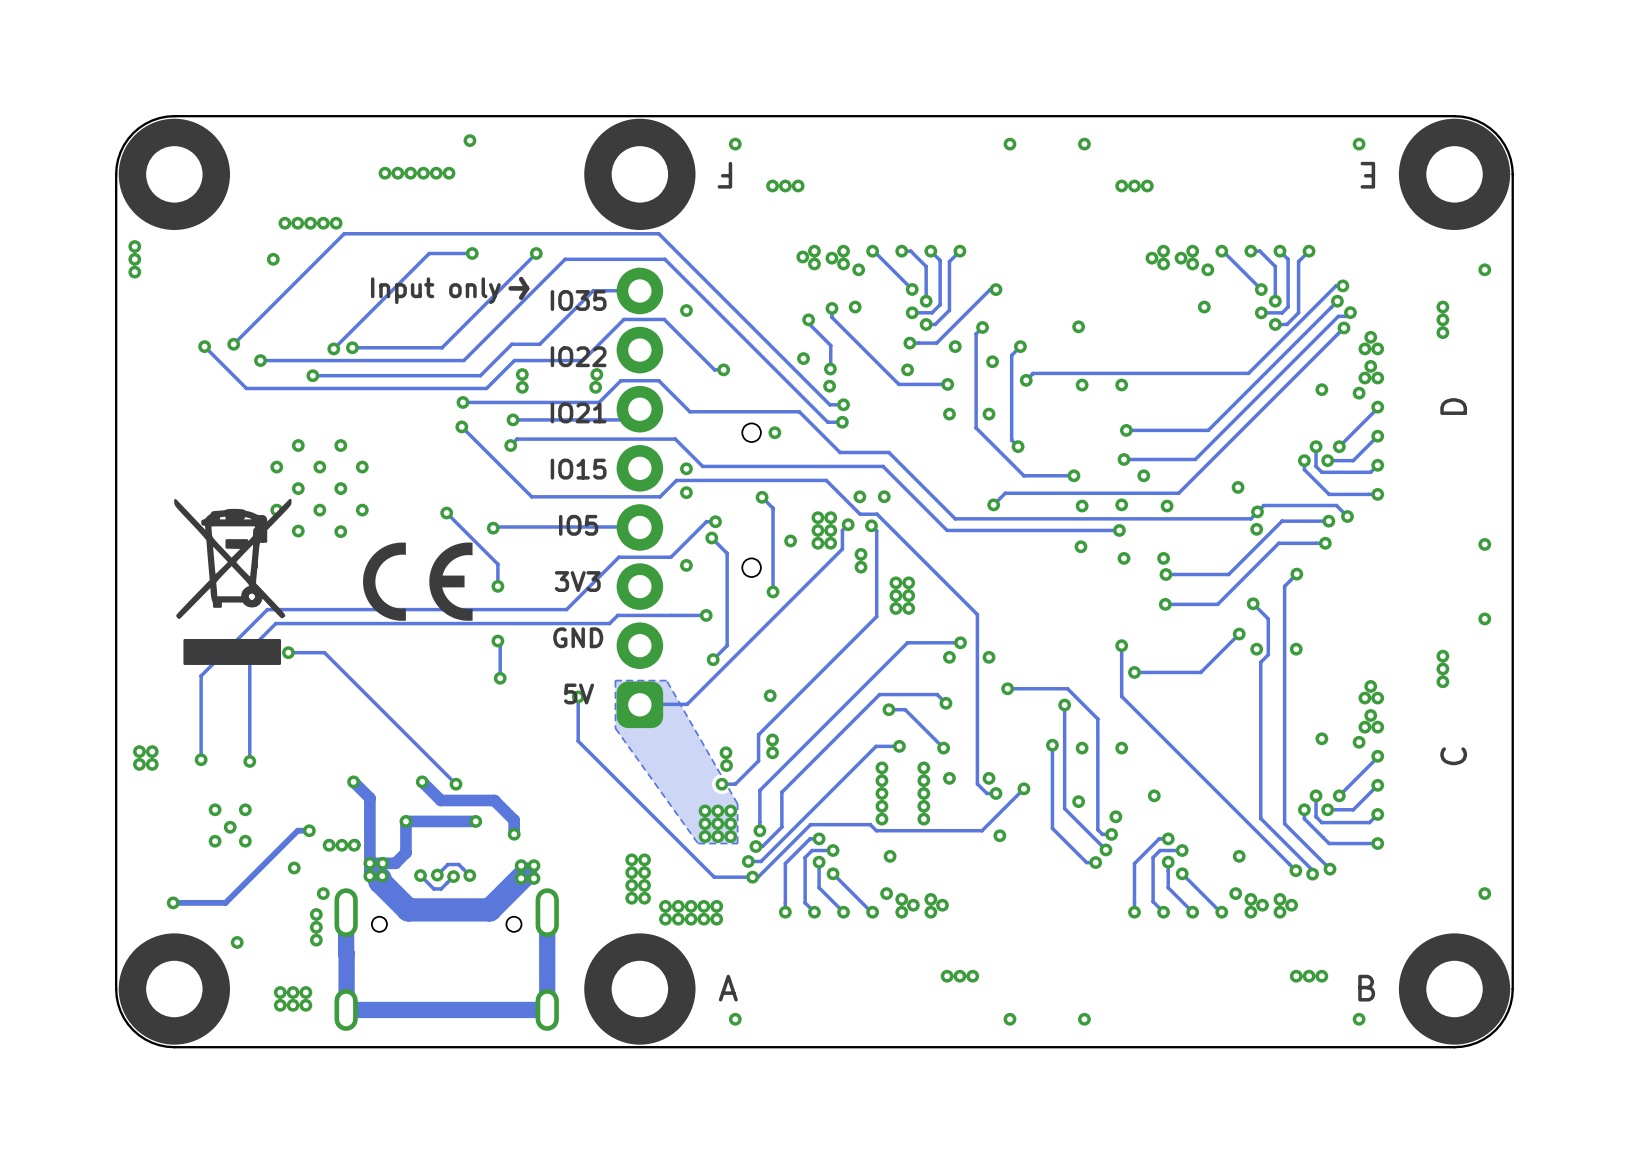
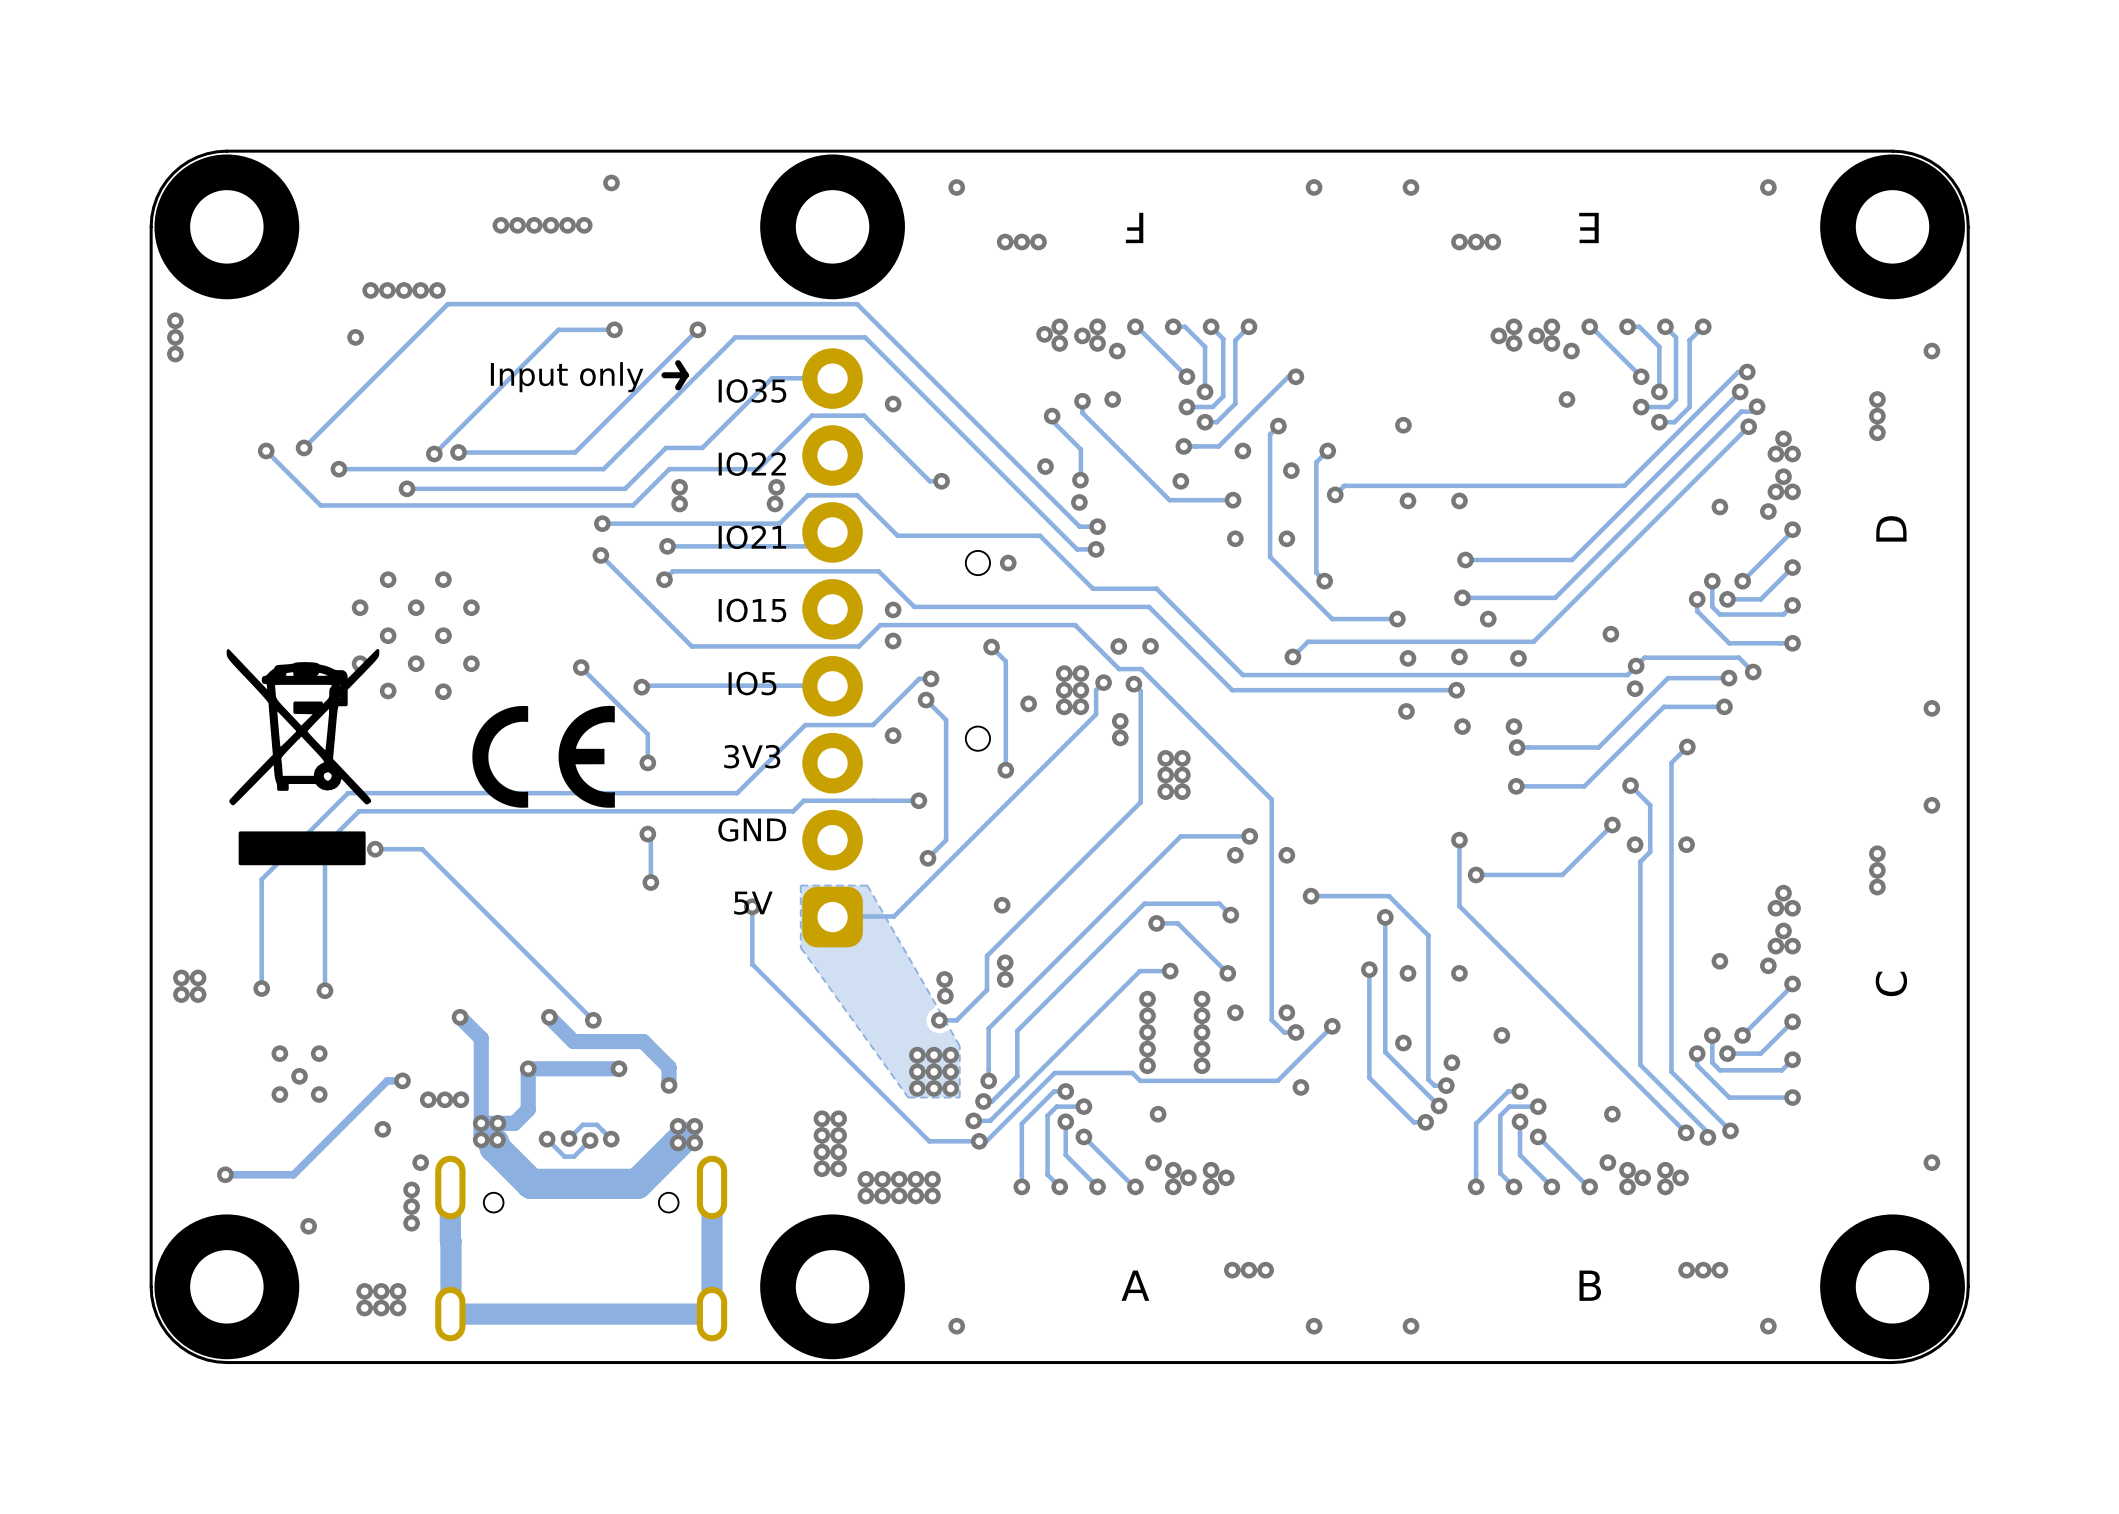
text position: F (724, 175) -> F (1134, 227)
text position: E (1367, 175) -> E (1588, 227)
text position: A (728, 988) -> A (1135, 1285)
text position: B (1366, 988) -> B (1590, 1285)

